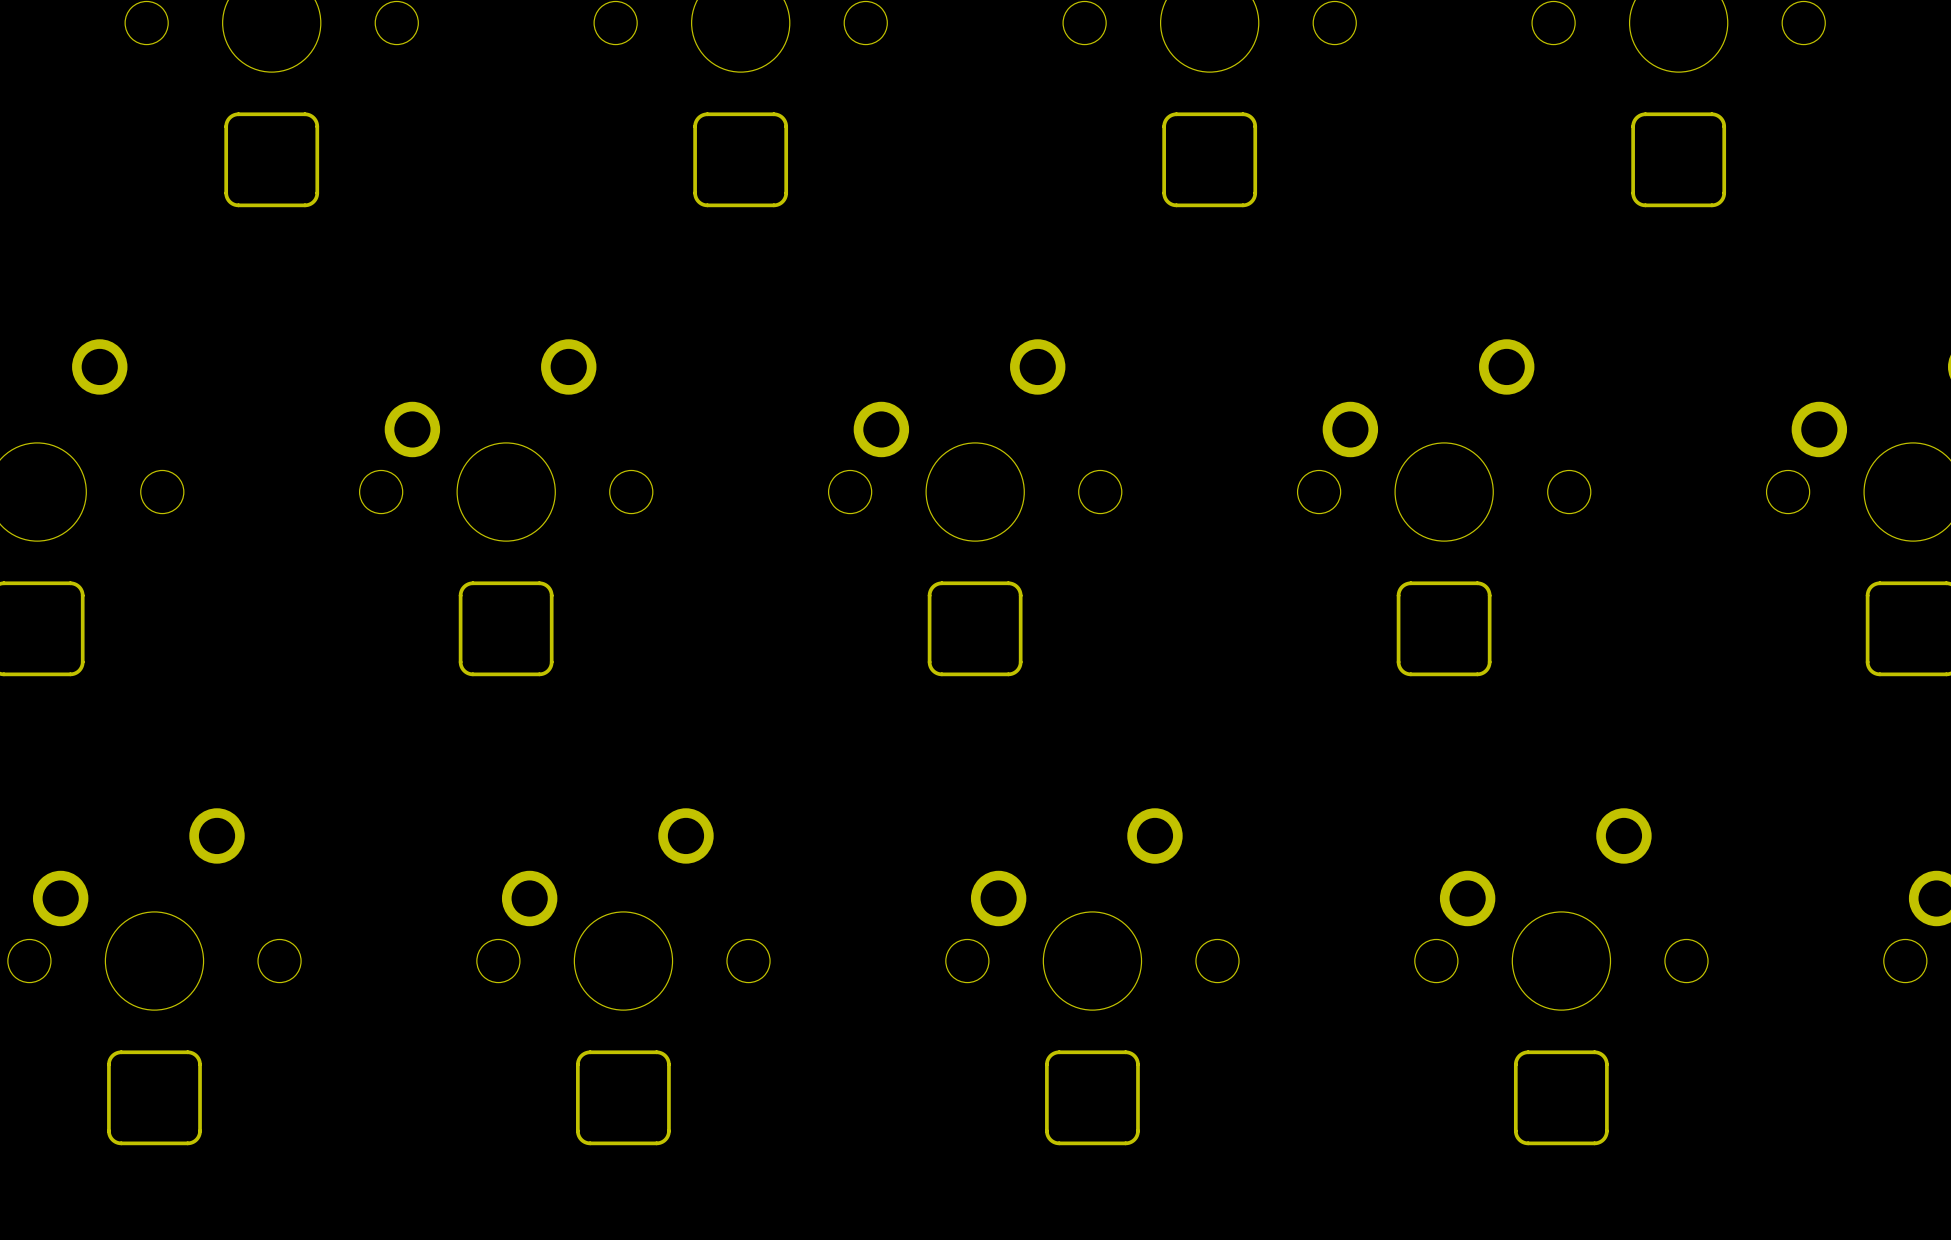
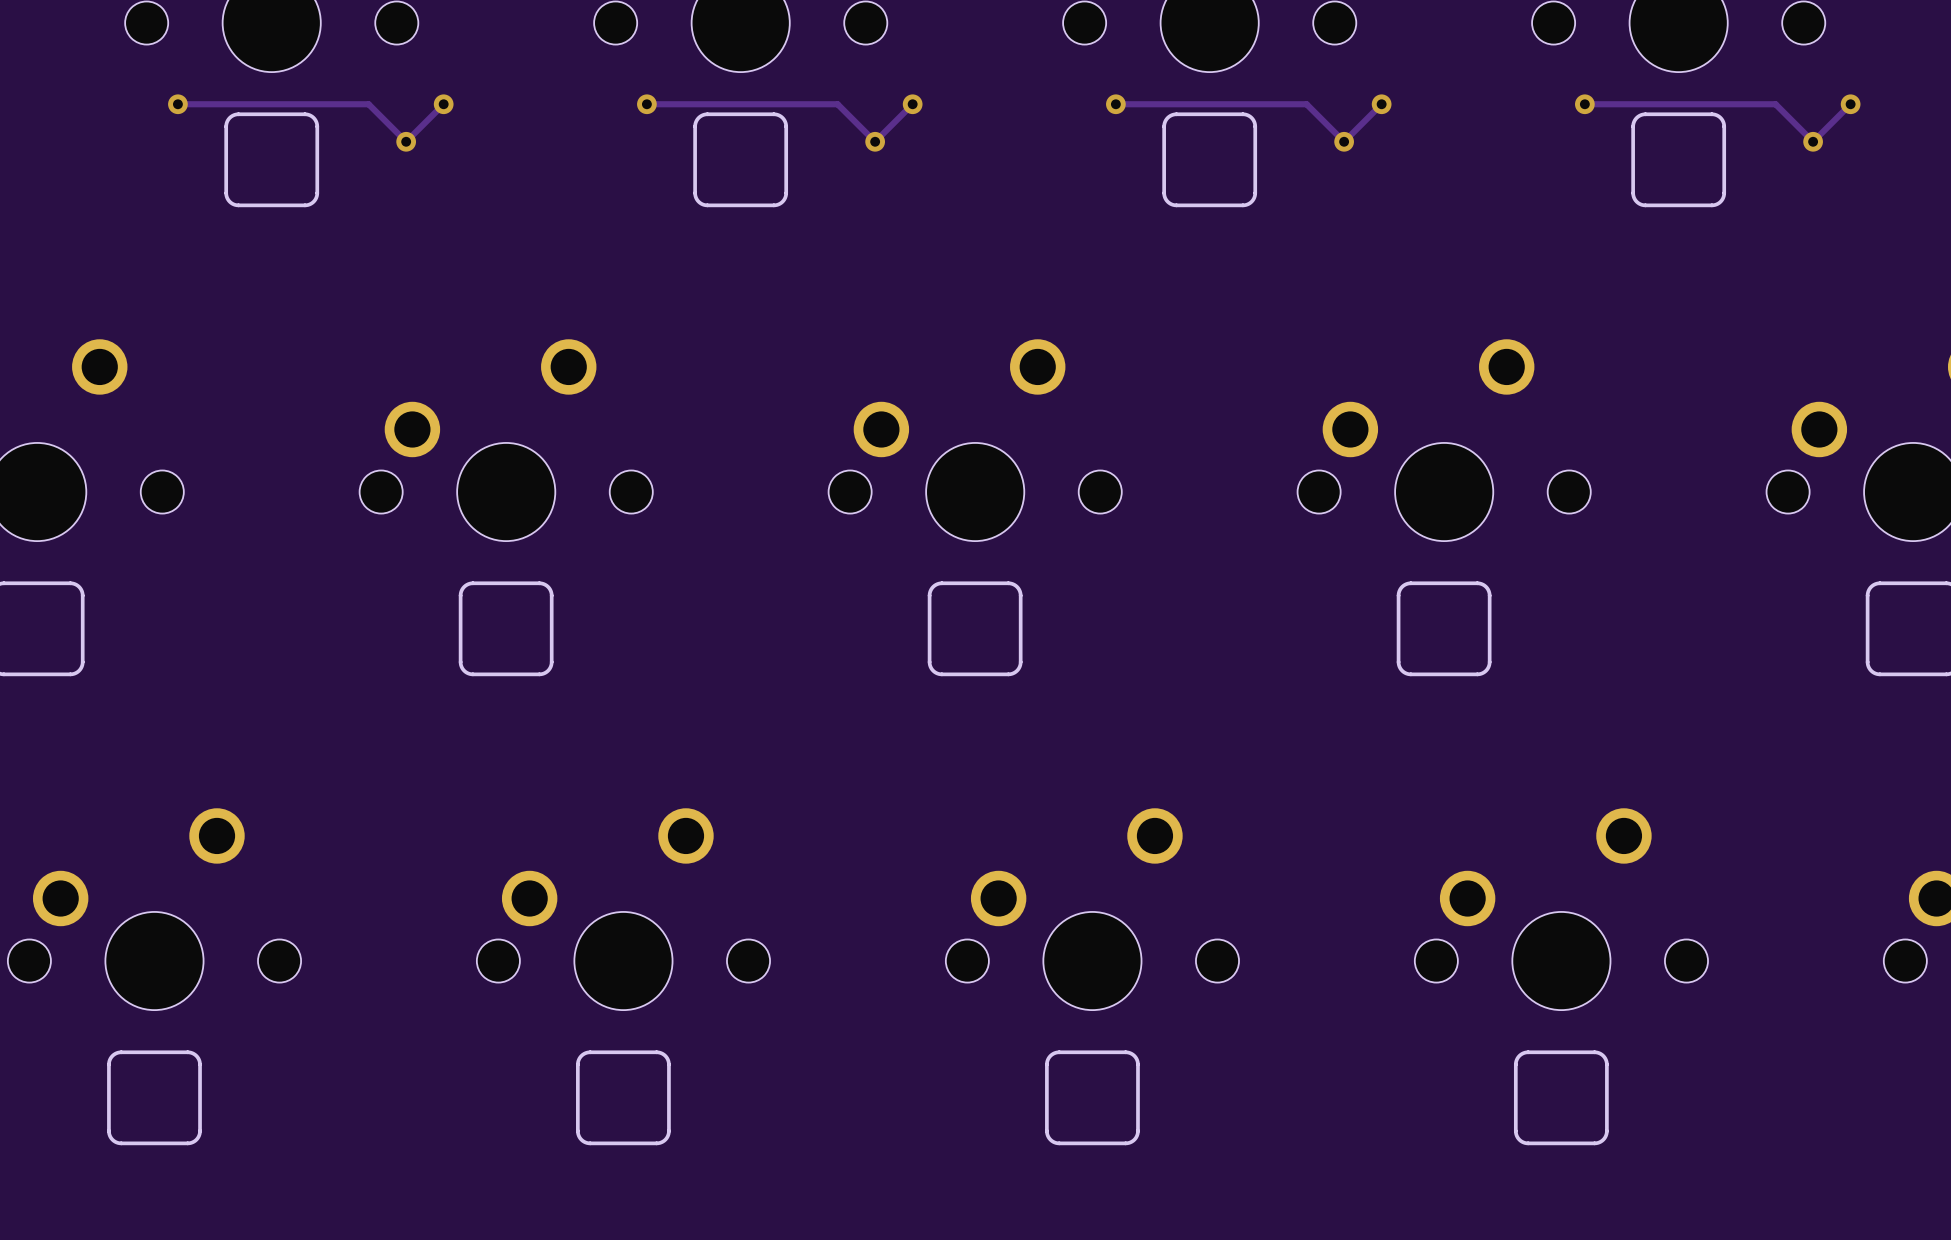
track: none -> (177, 104) (368, 104) (406, 141) (443, 104)
via: none -> (177, 104)
via: none -> (443, 104)
track: none -> (646, 104) (837, 104) (875, 141) (912, 104)
via: none -> (646, 104)
via: none -> (912, 104)
track: none -> (1115, 104) (1306, 104) (1344, 141) (1381, 104)
via: none -> (1115, 104)
via: none -> (1381, 104)
track: none -> (1584, 104) (1775, 104) (1813, 141) (1850, 104)
via: none -> (1584, 104)
via: none -> (1850, 104)
via: none -> (406, 141)
via: none -> (875, 141)
via: none -> (1344, 141)
via: none -> (1813, 141)

